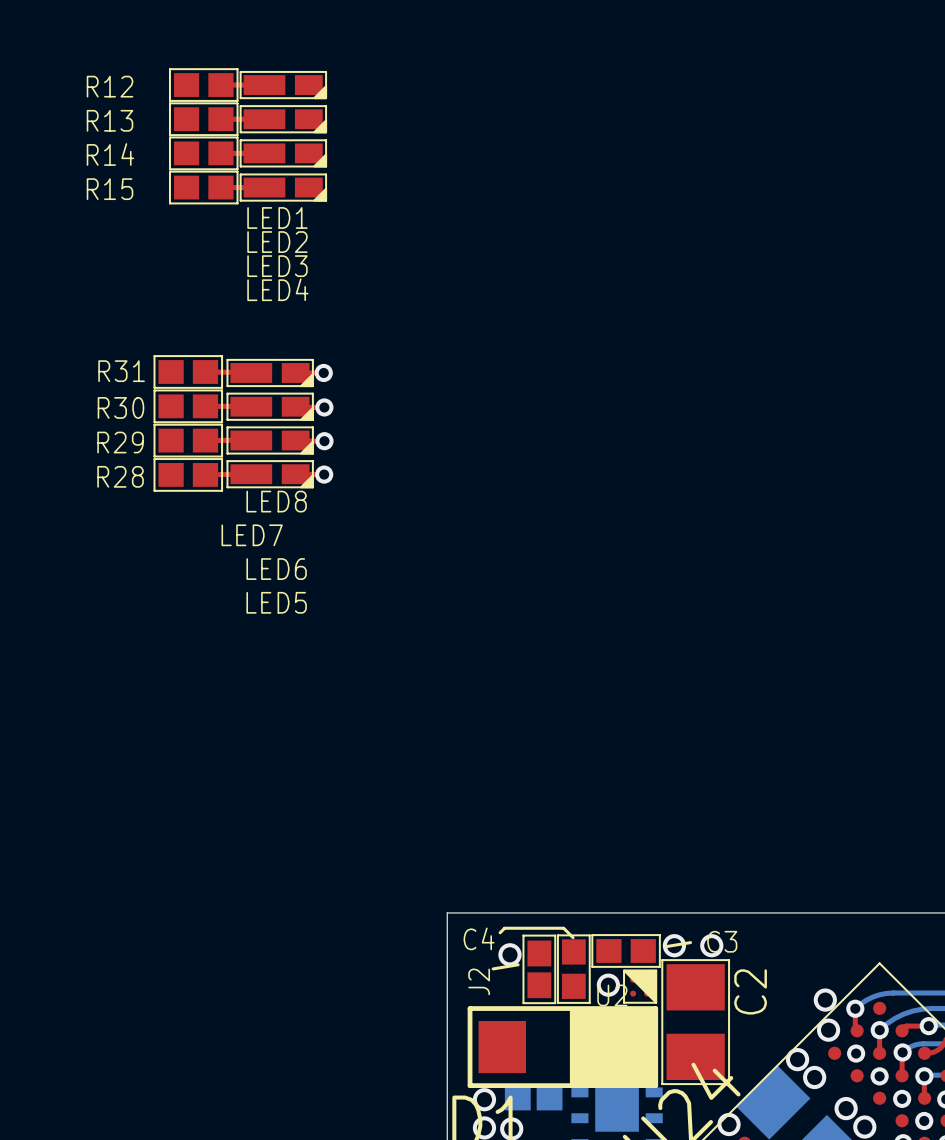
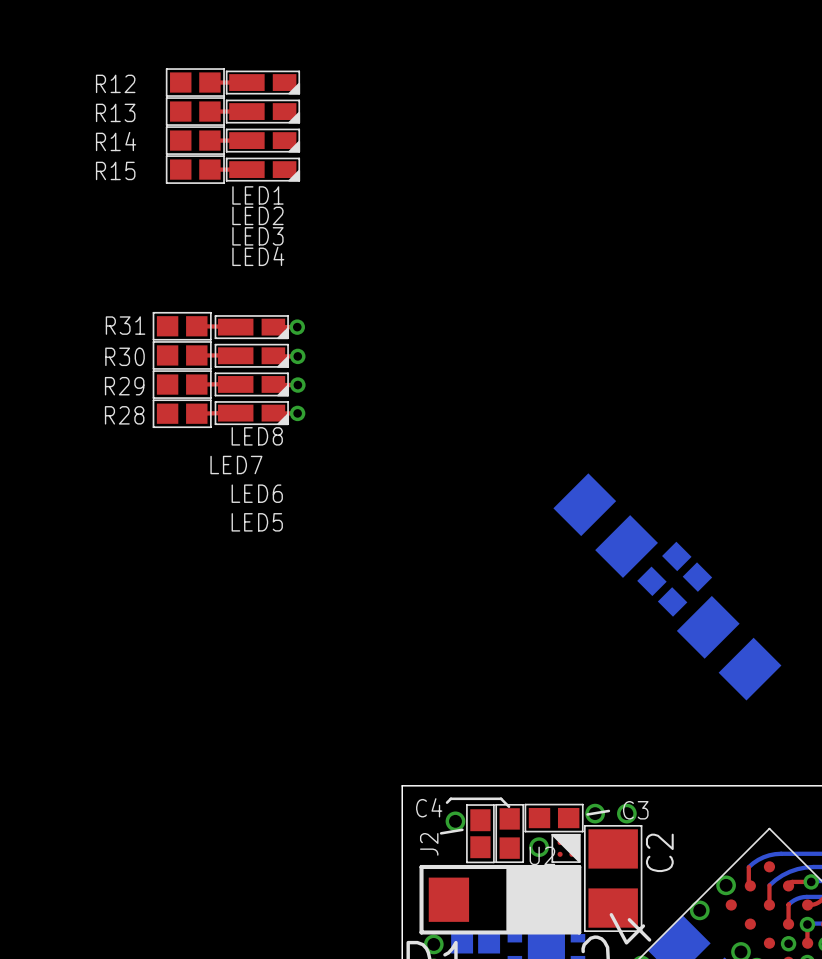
part: none -> (605, 525)
part: none -> (687, 566)
part: none -> (662, 591)
part: none -> (729, 648)
via: (825, 1000) -> none
via: (855, 1008) -> none
via: (879, 1030) -> none
via: (902, 1052) -> none
via: (856, 1053) -> none
via: (879, 1076) -> none
via: (814, 1077) -> none

